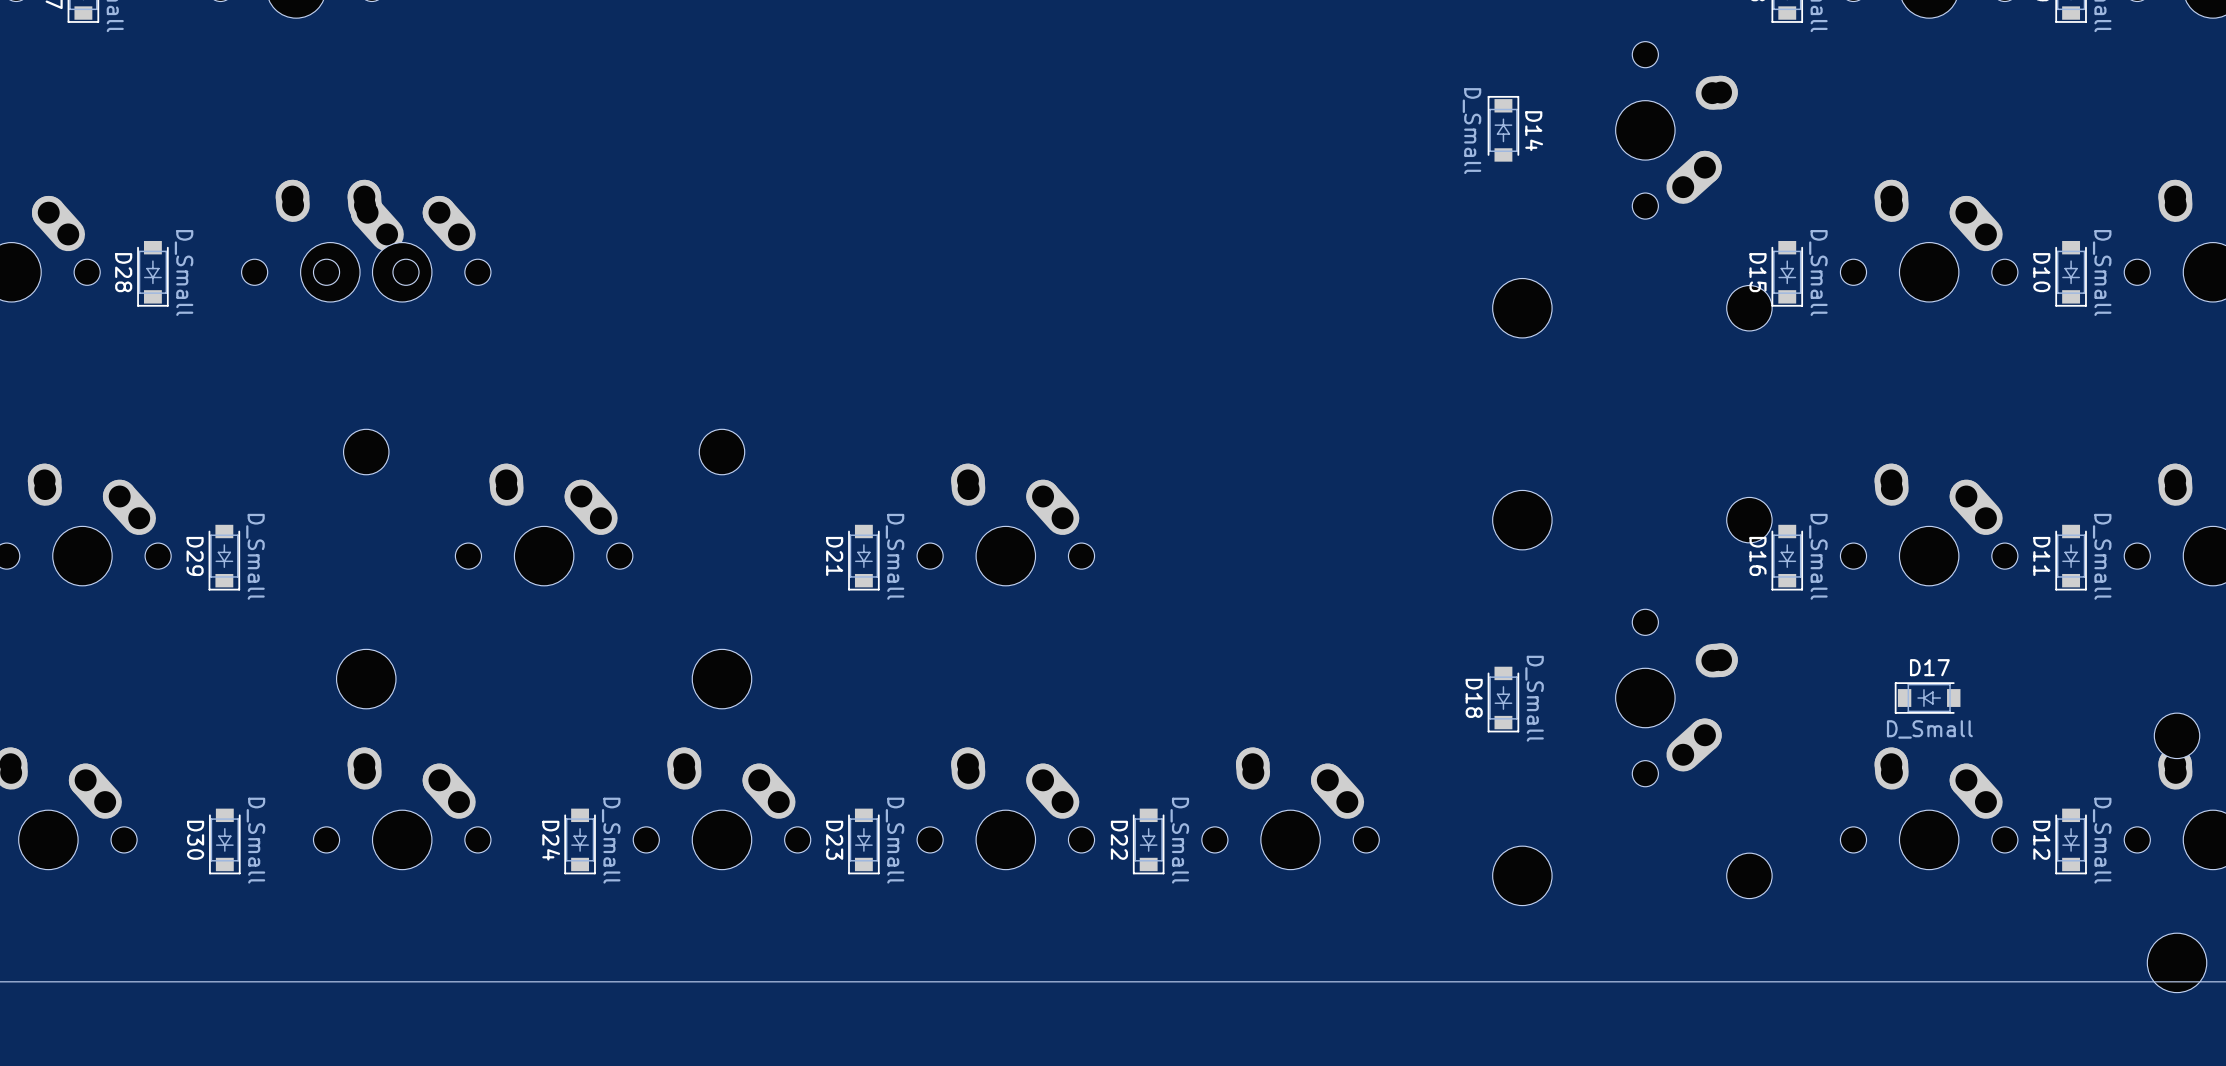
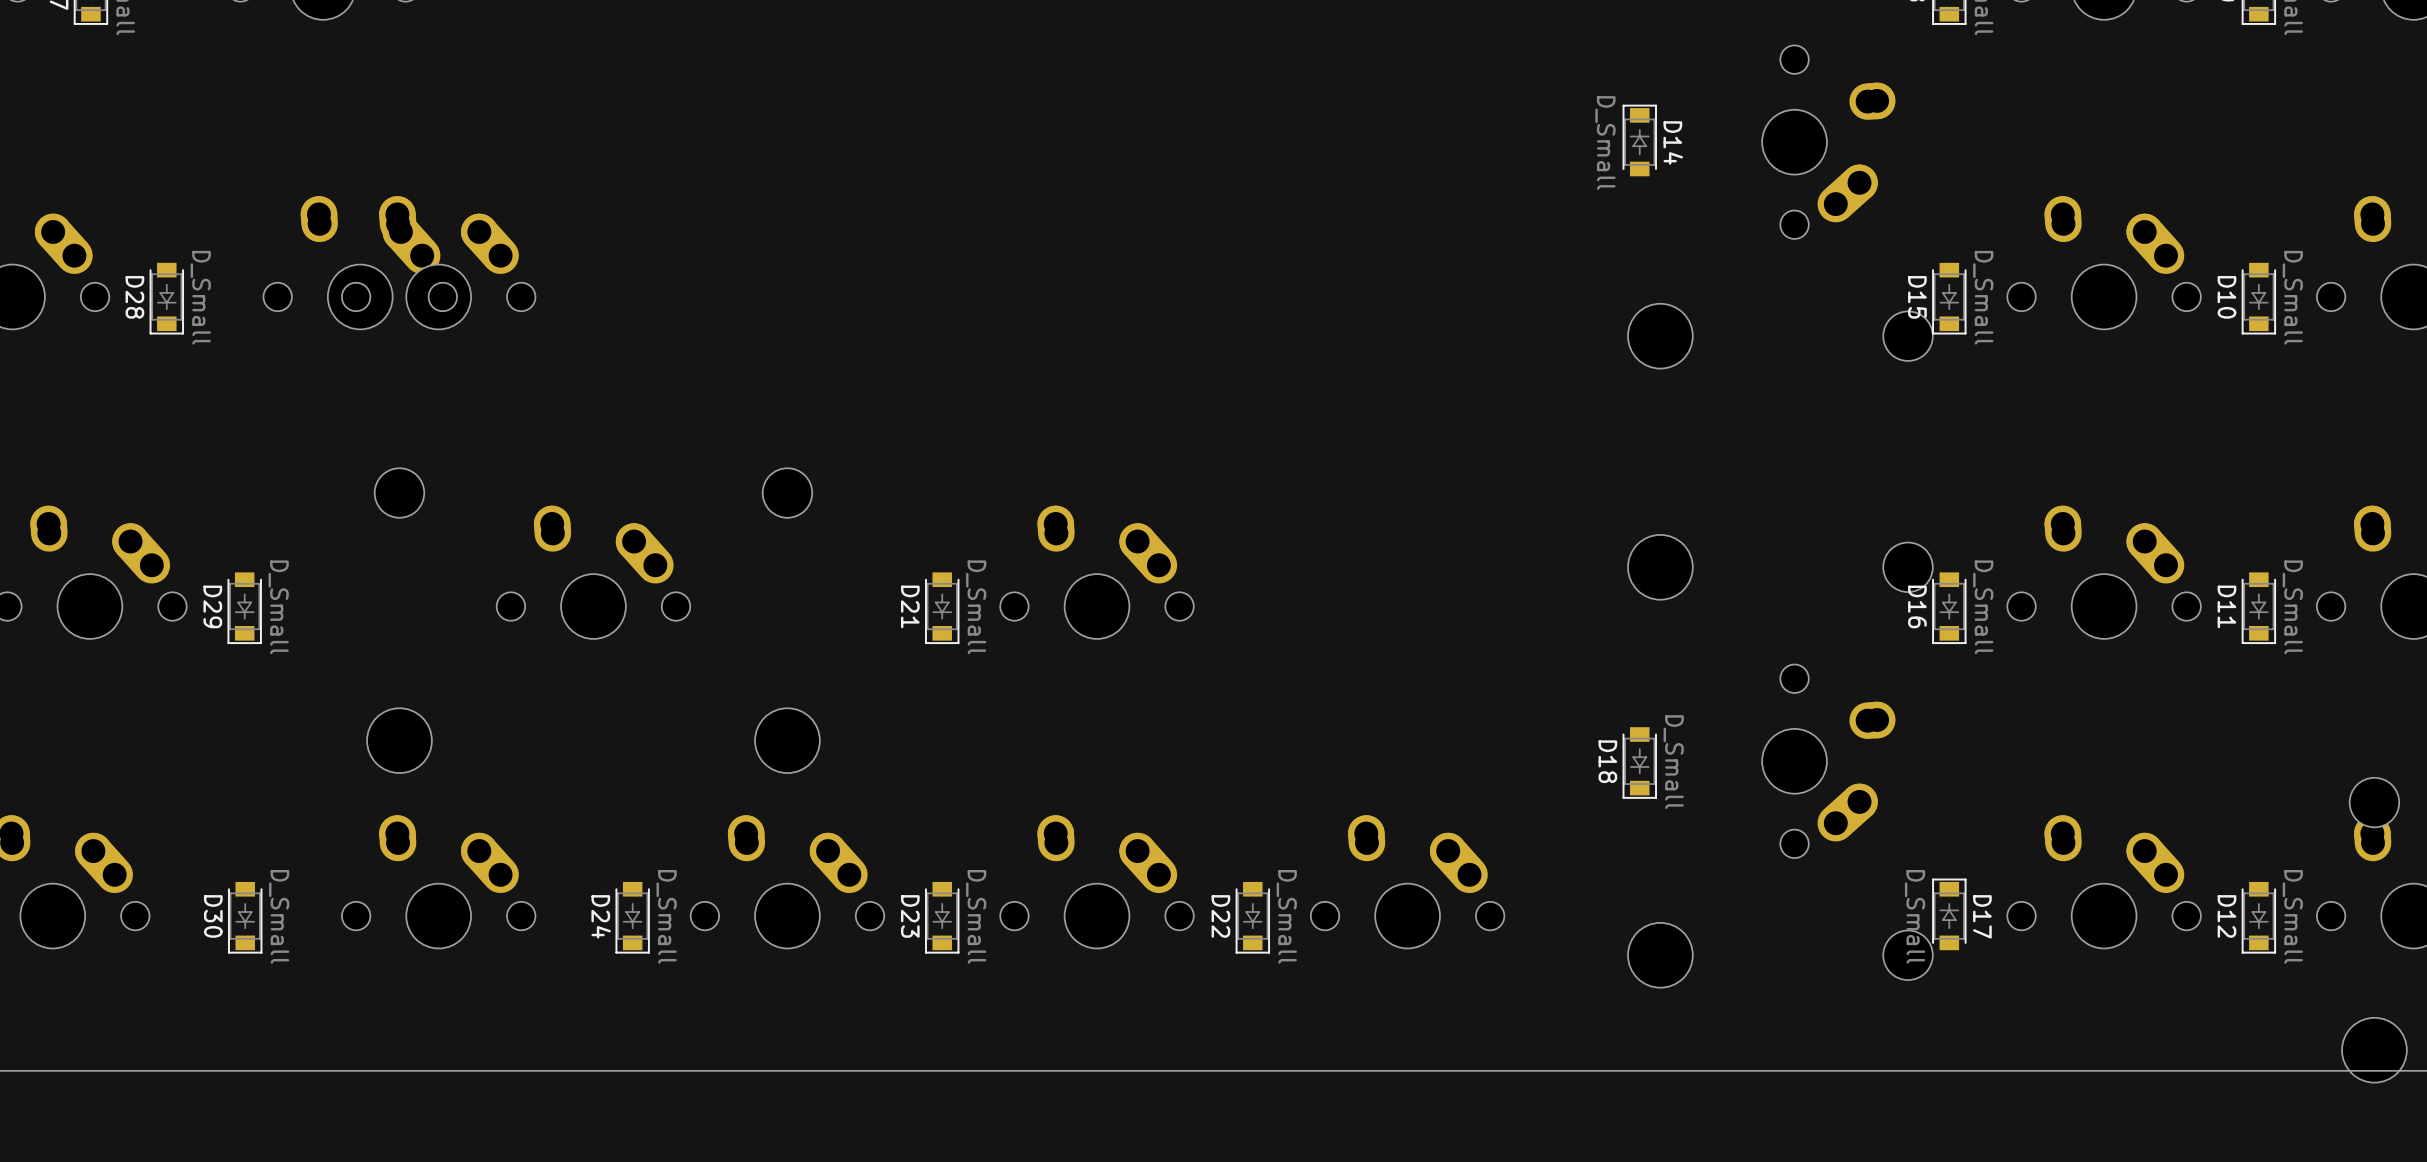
D17 rotation: 0° (1927, 698) -> 90° clockwise (1949, 914)
D17 position: (1927, 698) -> (1949, 914)

